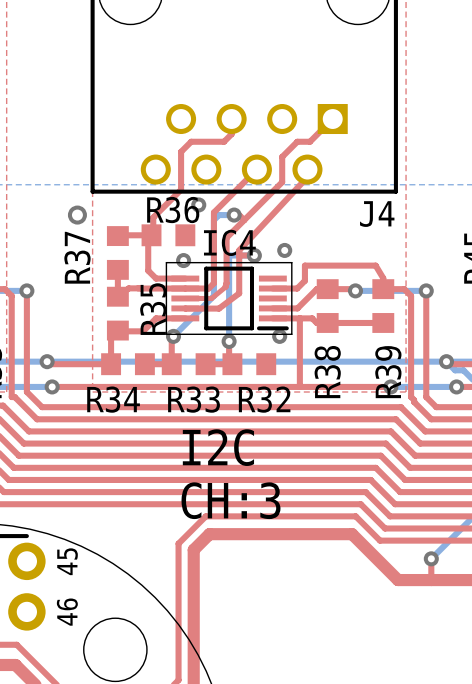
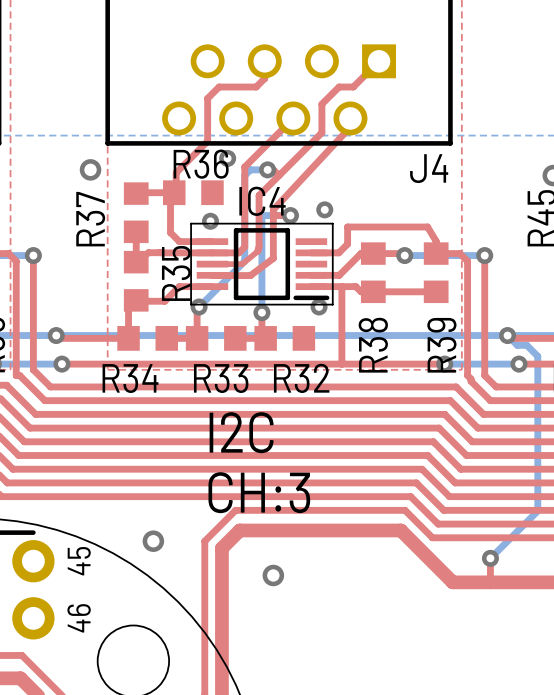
via: none -> (153, 541)
via: none -> (273, 575)

